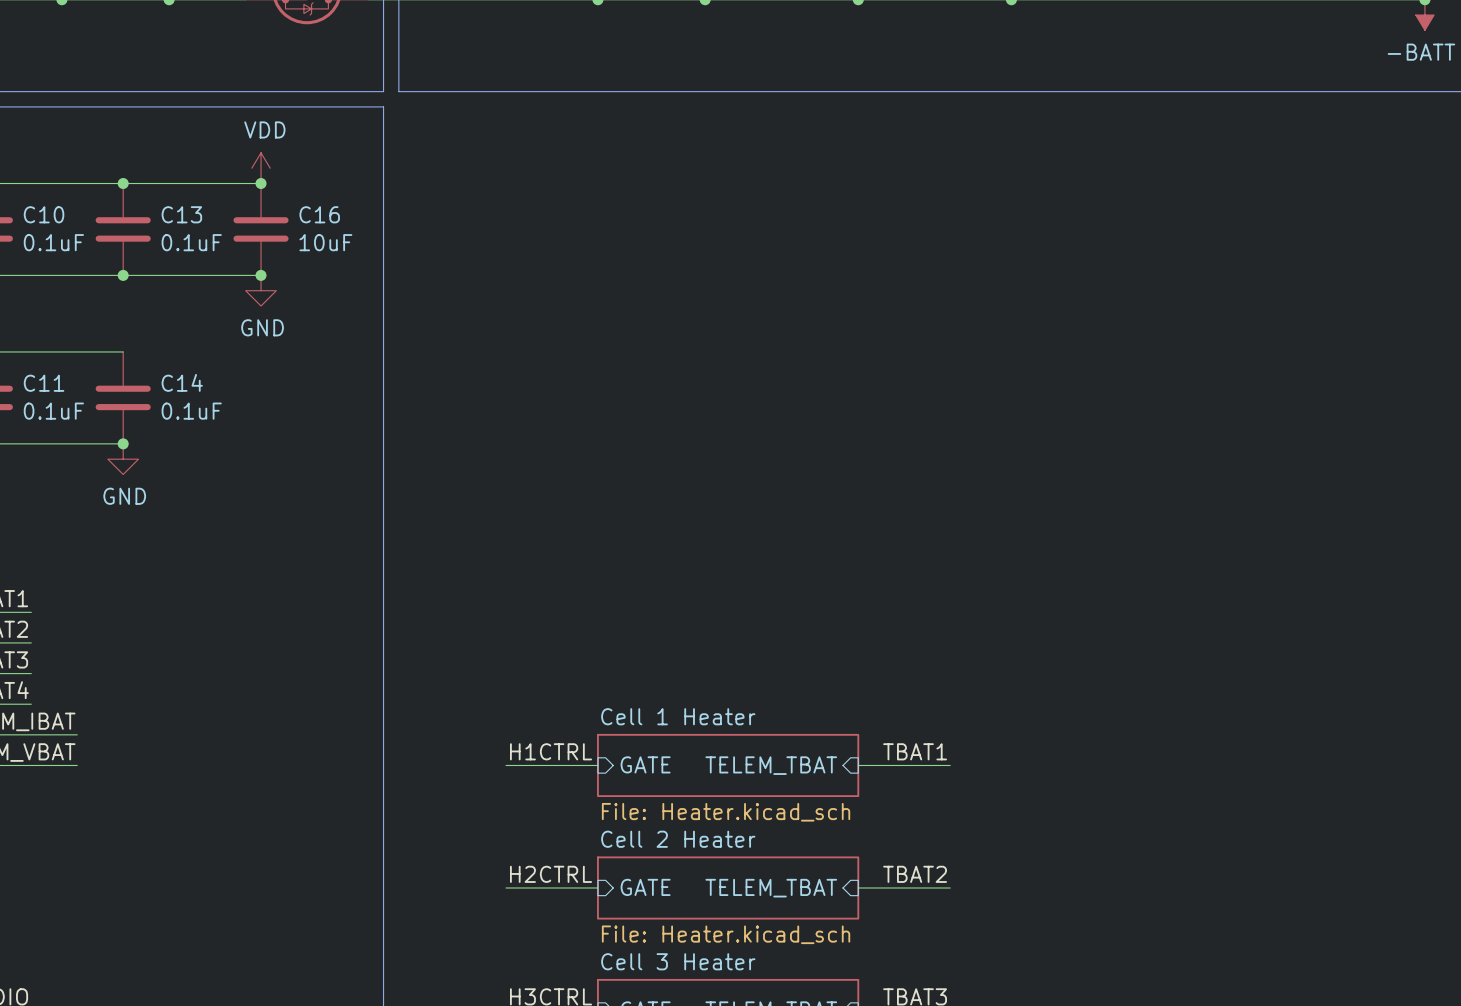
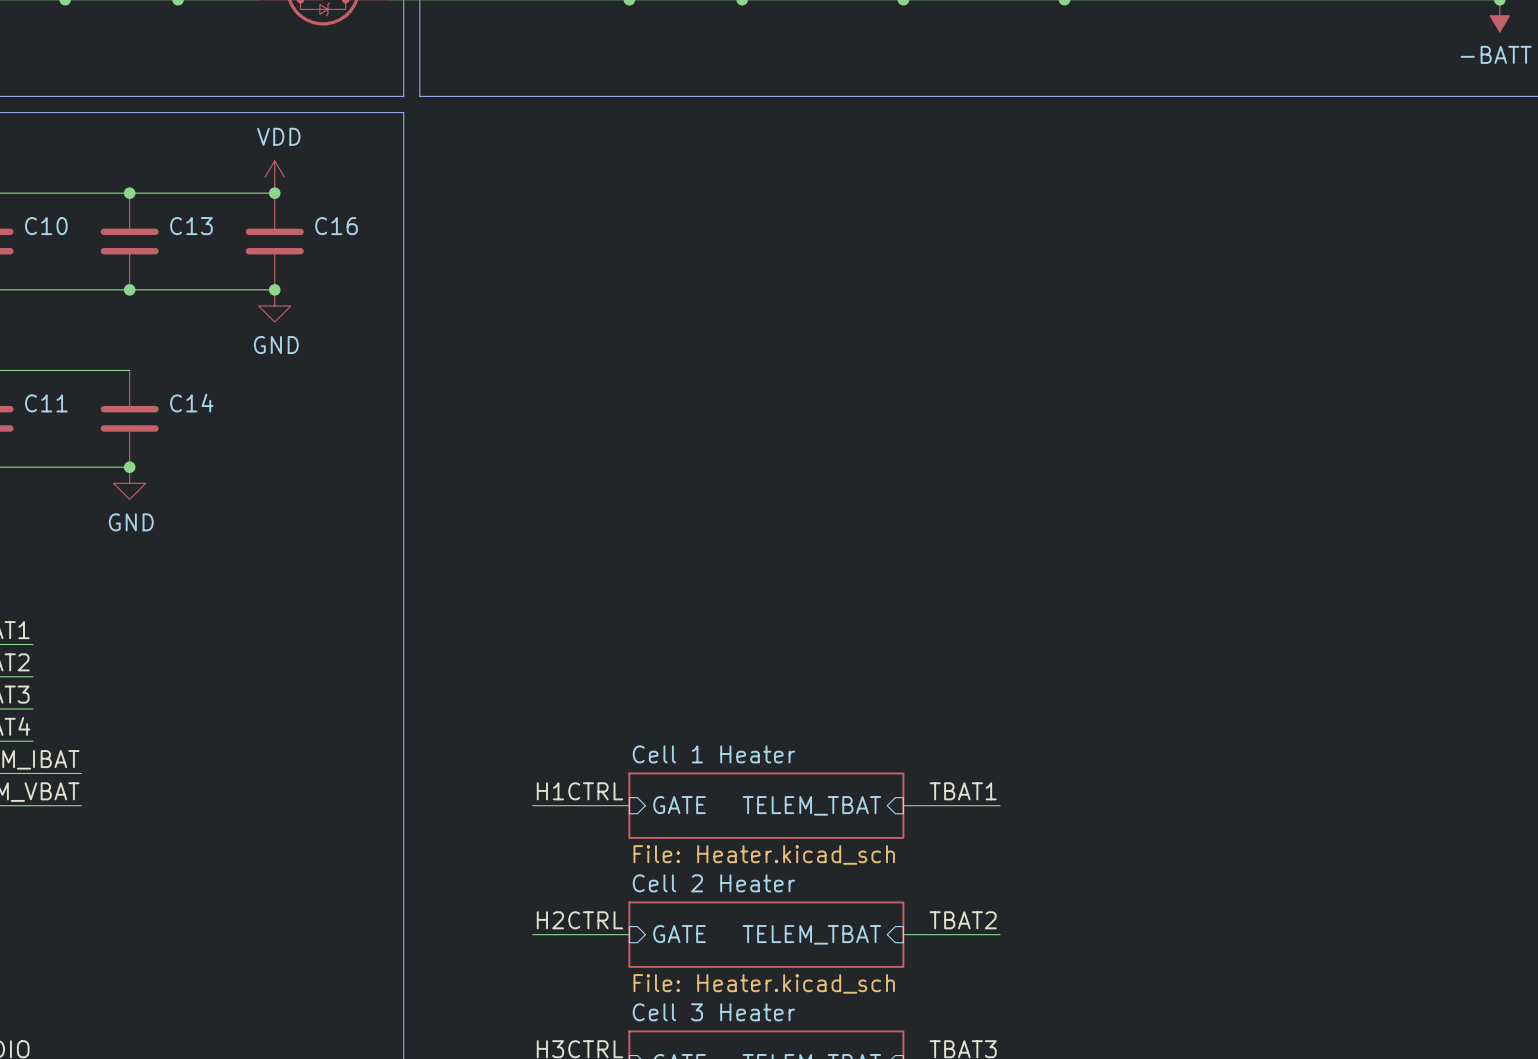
C10 value: 0.1uF (53, 242) -> none
C13 value: 0.1uF (191, 242) -> none
C16 value: 10uF (325, 242) -> none
C11 value: 0.1uF (53, 411) -> none
C14 value: 0.1uF (191, 411) -> none

